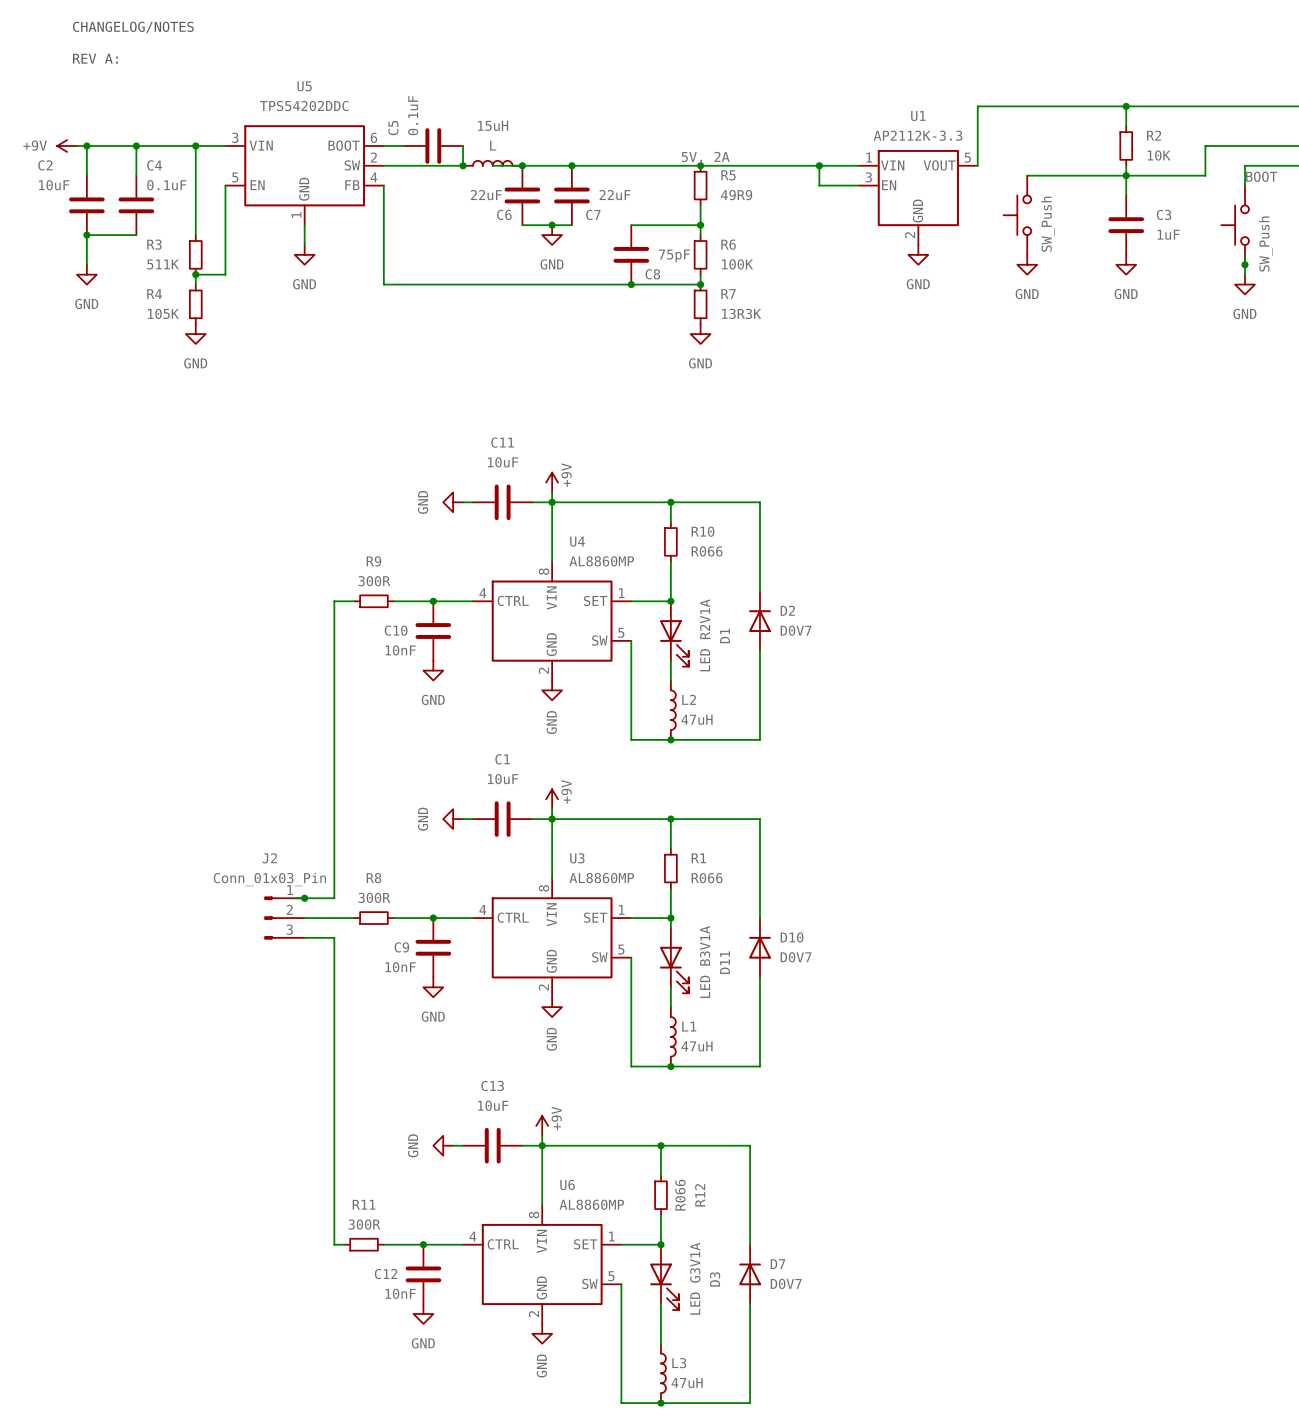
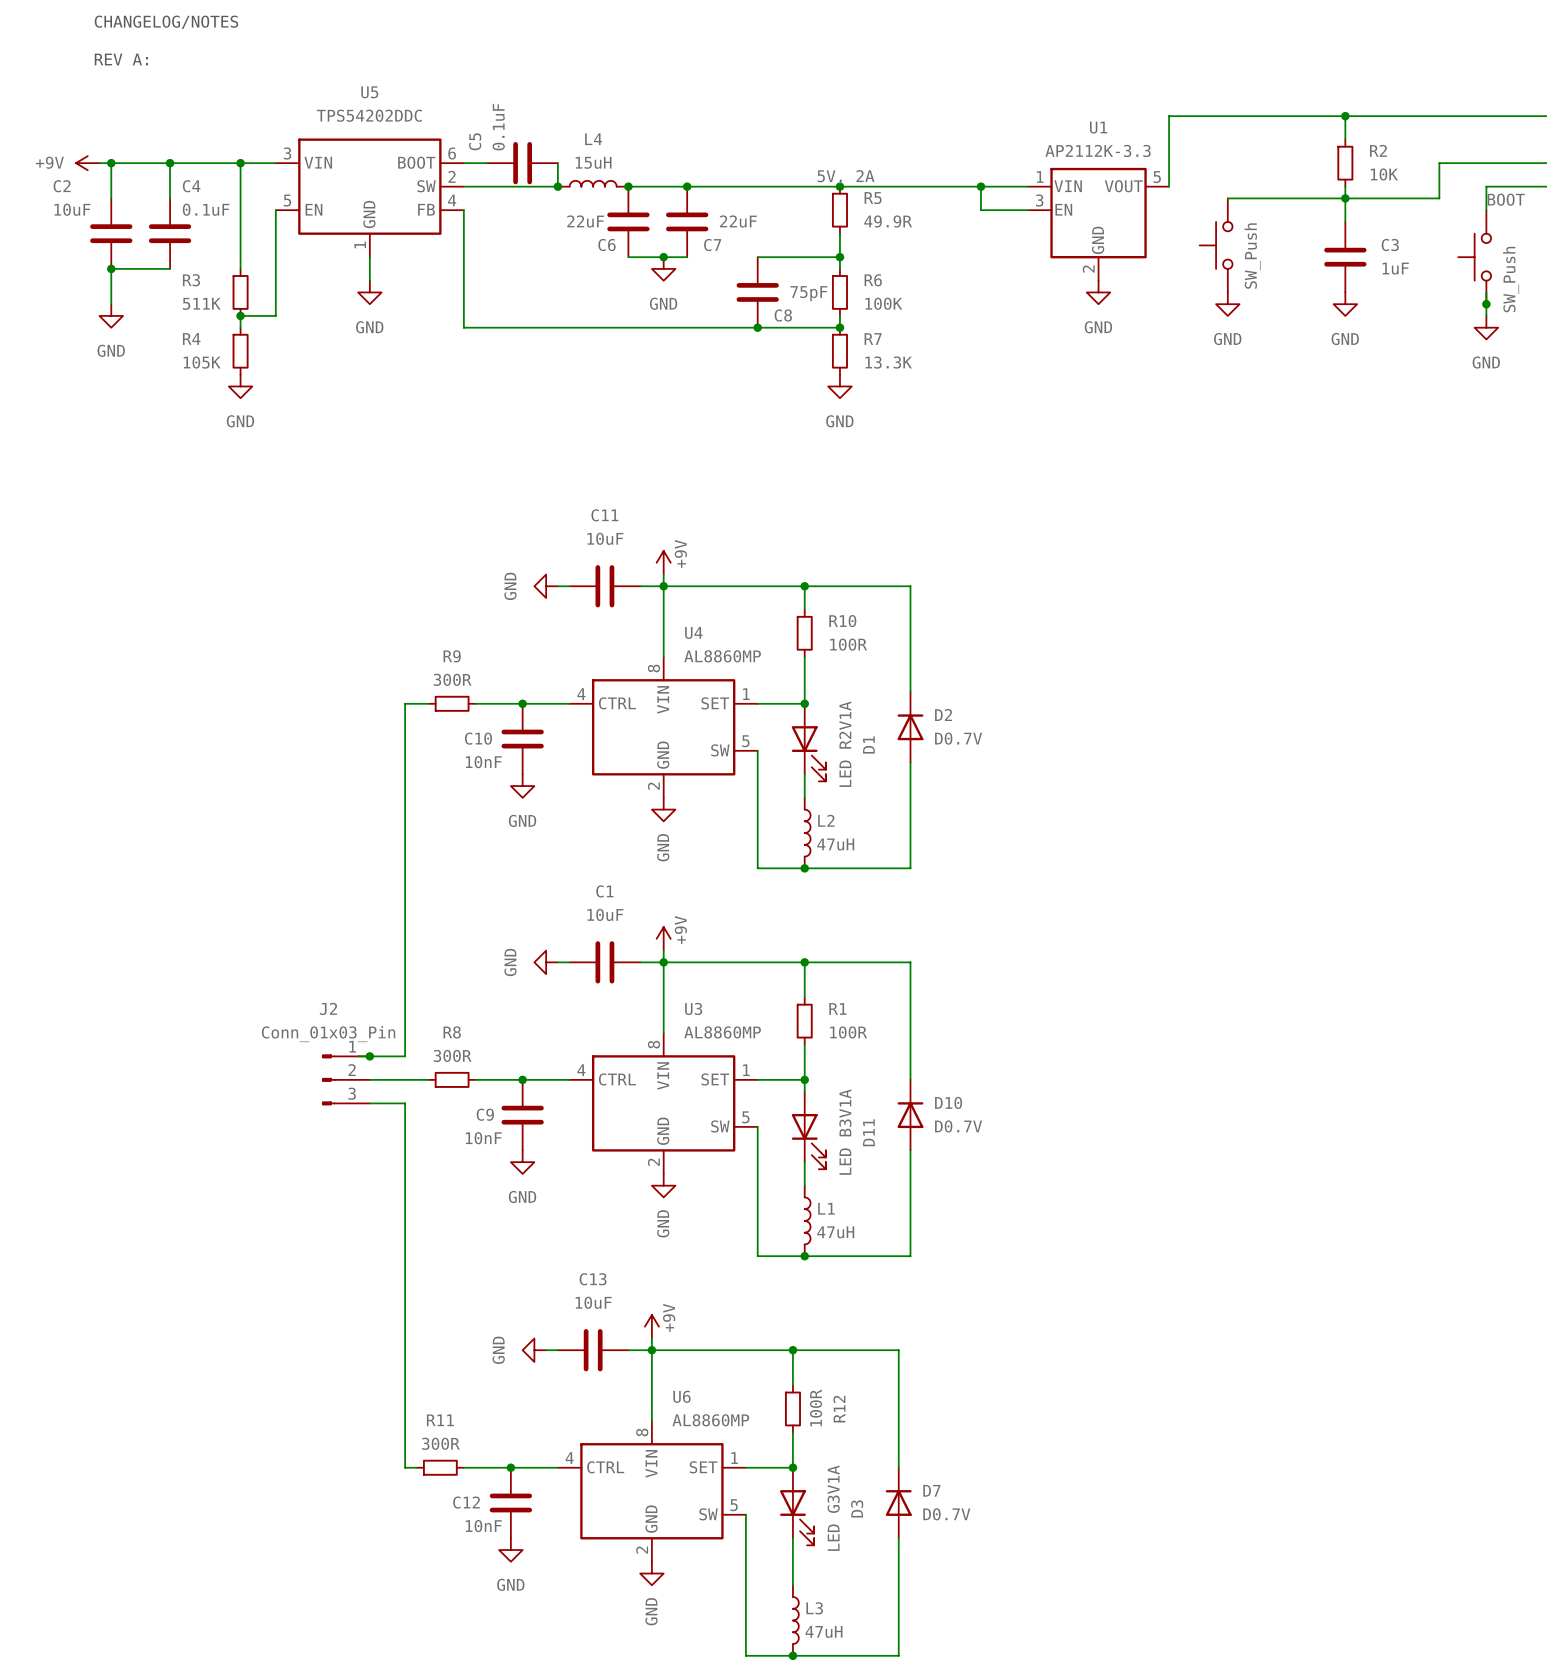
15uH name: 15uH (493, 125) -> L4 (593, 139)
15uH value: L (493, 145) -> 15uH (593, 162)
wire: (492, 165) (522, 165) -> none
R5 value: 49R9 (736, 195) -> 49.9R (888, 221)
R7 value: 13R3K (741, 313) -> 13.3K (888, 362)
R10 value: R066 (707, 551) -> 100R (848, 644)
D2 value: D0V7 (796, 630) -> D0.7V (958, 738)
R1 value: R066 (707, 878) -> 100R (848, 1032)
D10 value: D0V7 (796, 957) -> D0.7V (958, 1126)
R12 value: R066 (680, 1195) -> 100R (816, 1408)
D7 value: D0V7 (786, 1283) -> D0.7V (946, 1514)

